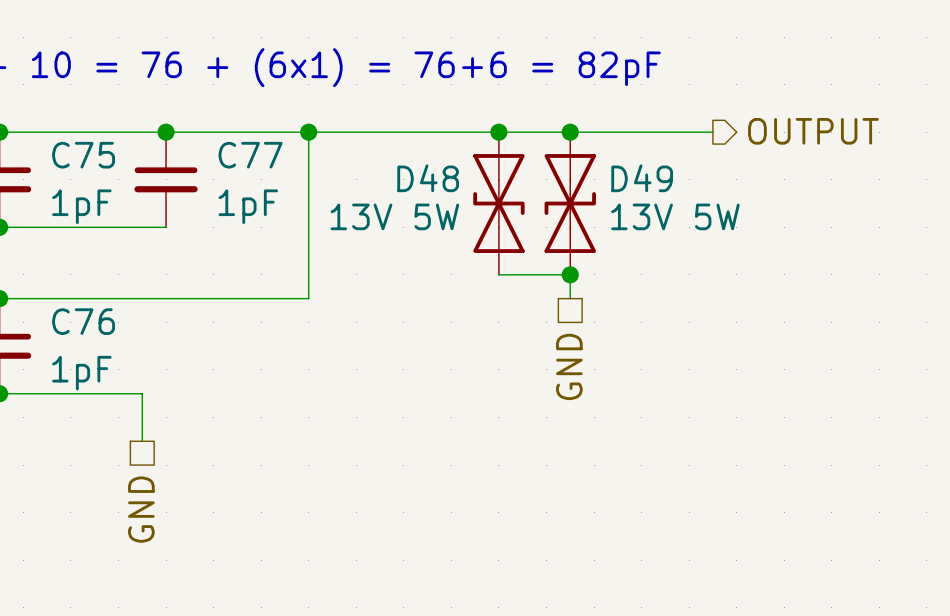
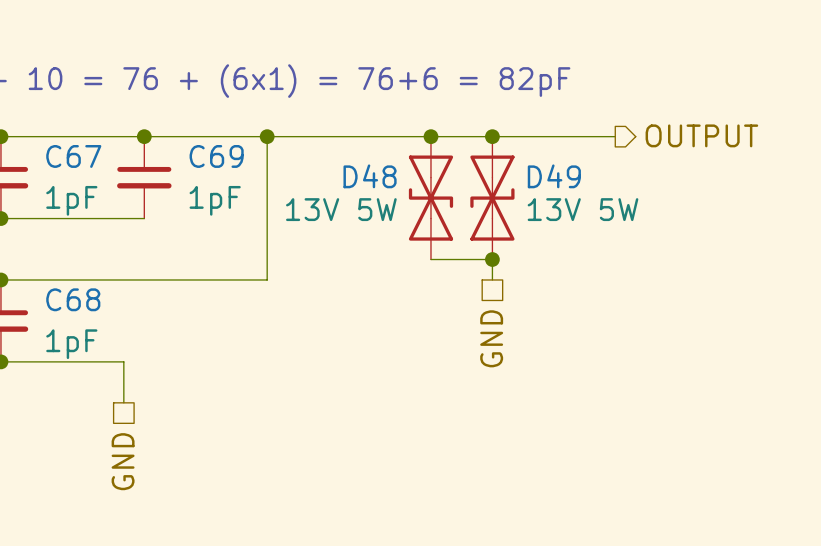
C75 name: C75 (83, 155) -> C67 (73, 156)
C77 name: C77 (250, 155) -> C69 (216, 156)
C76 name: C76 (83, 321) -> C68 (73, 299)

